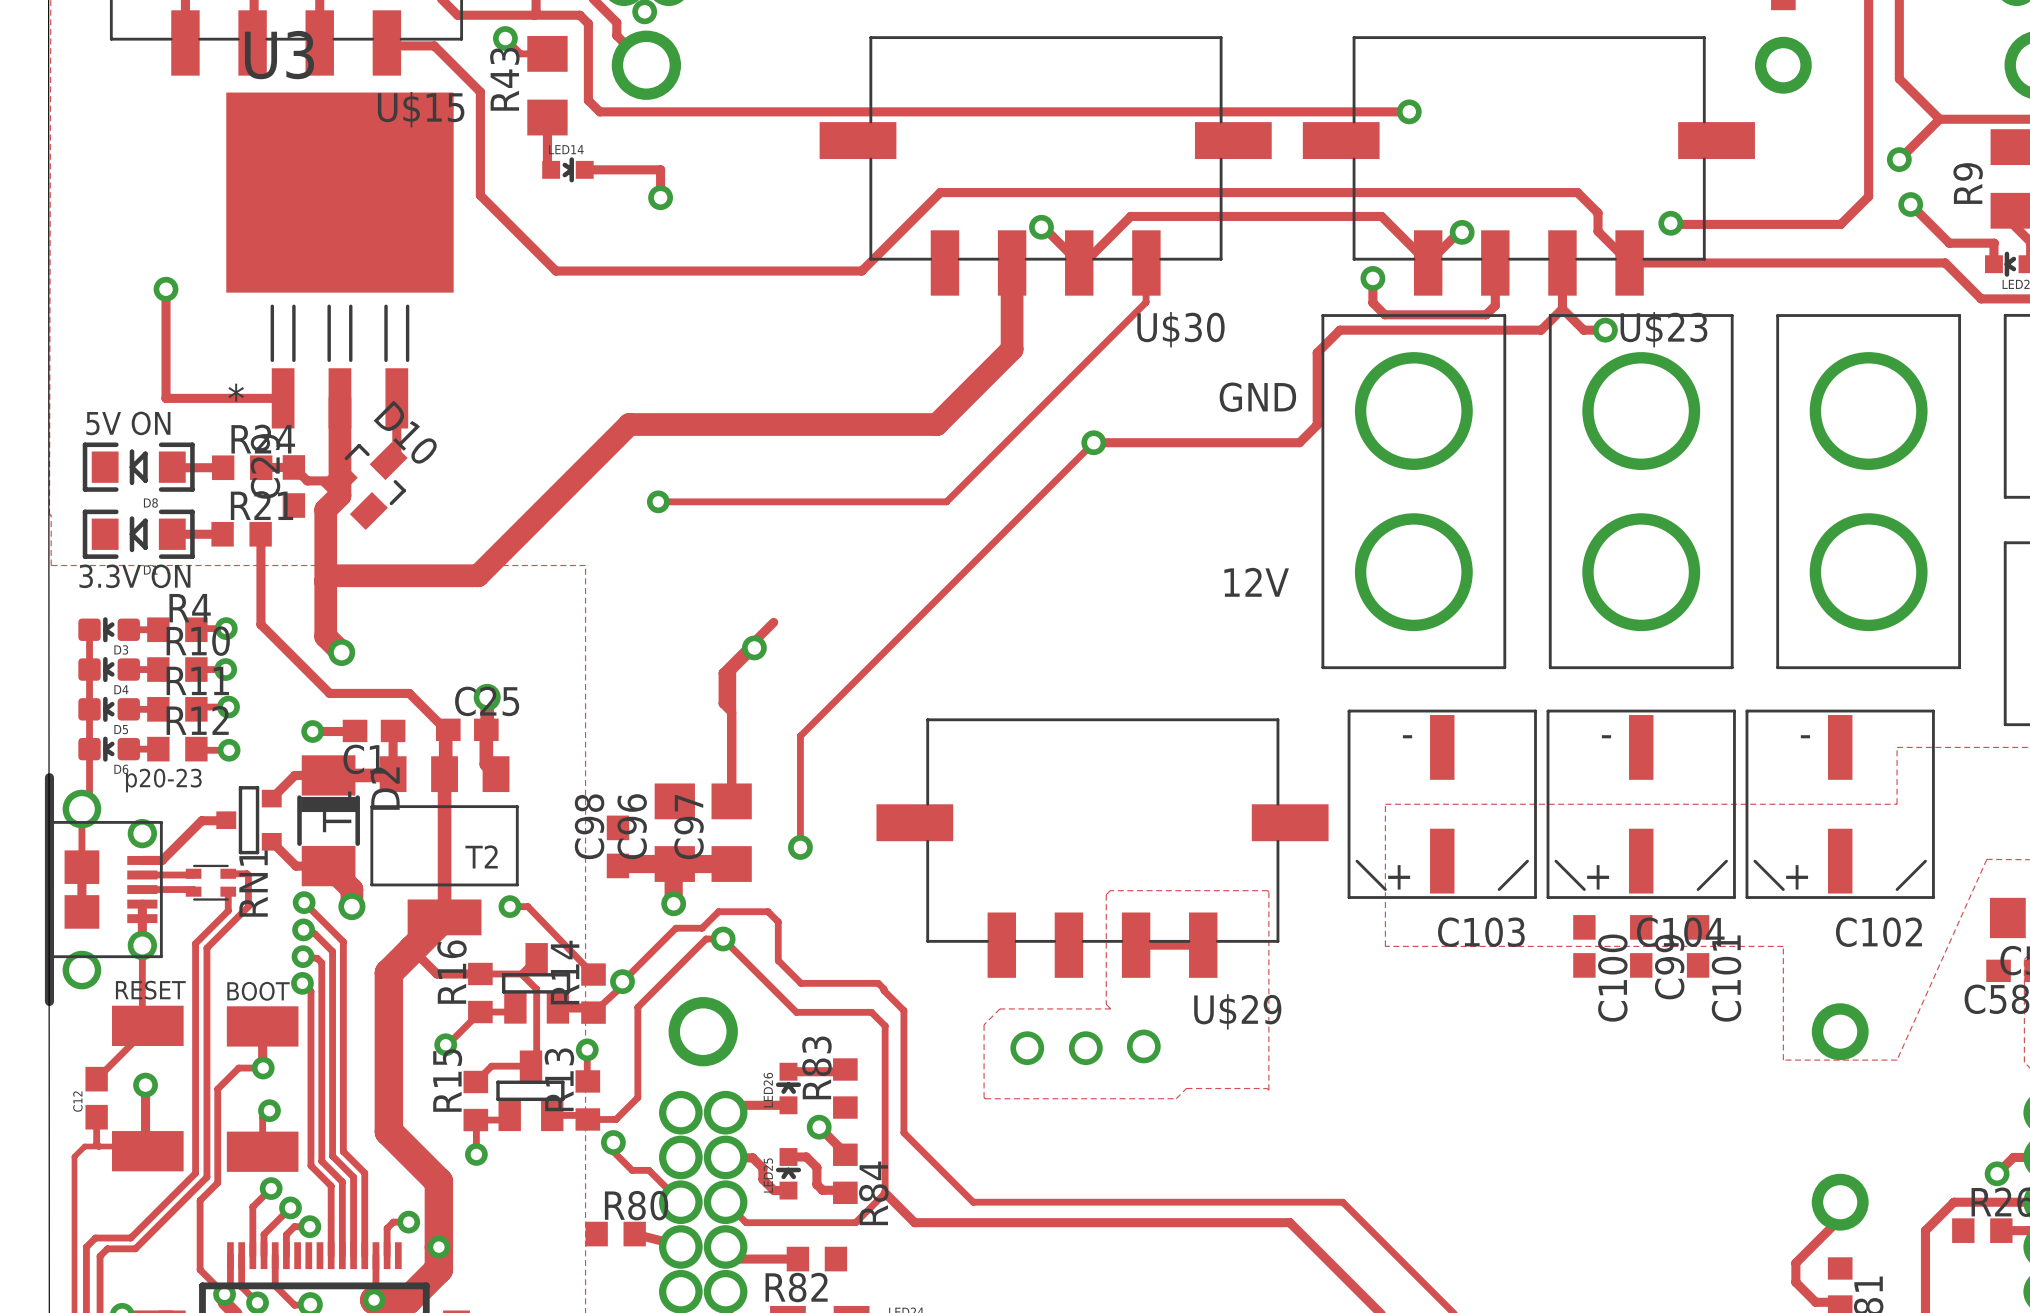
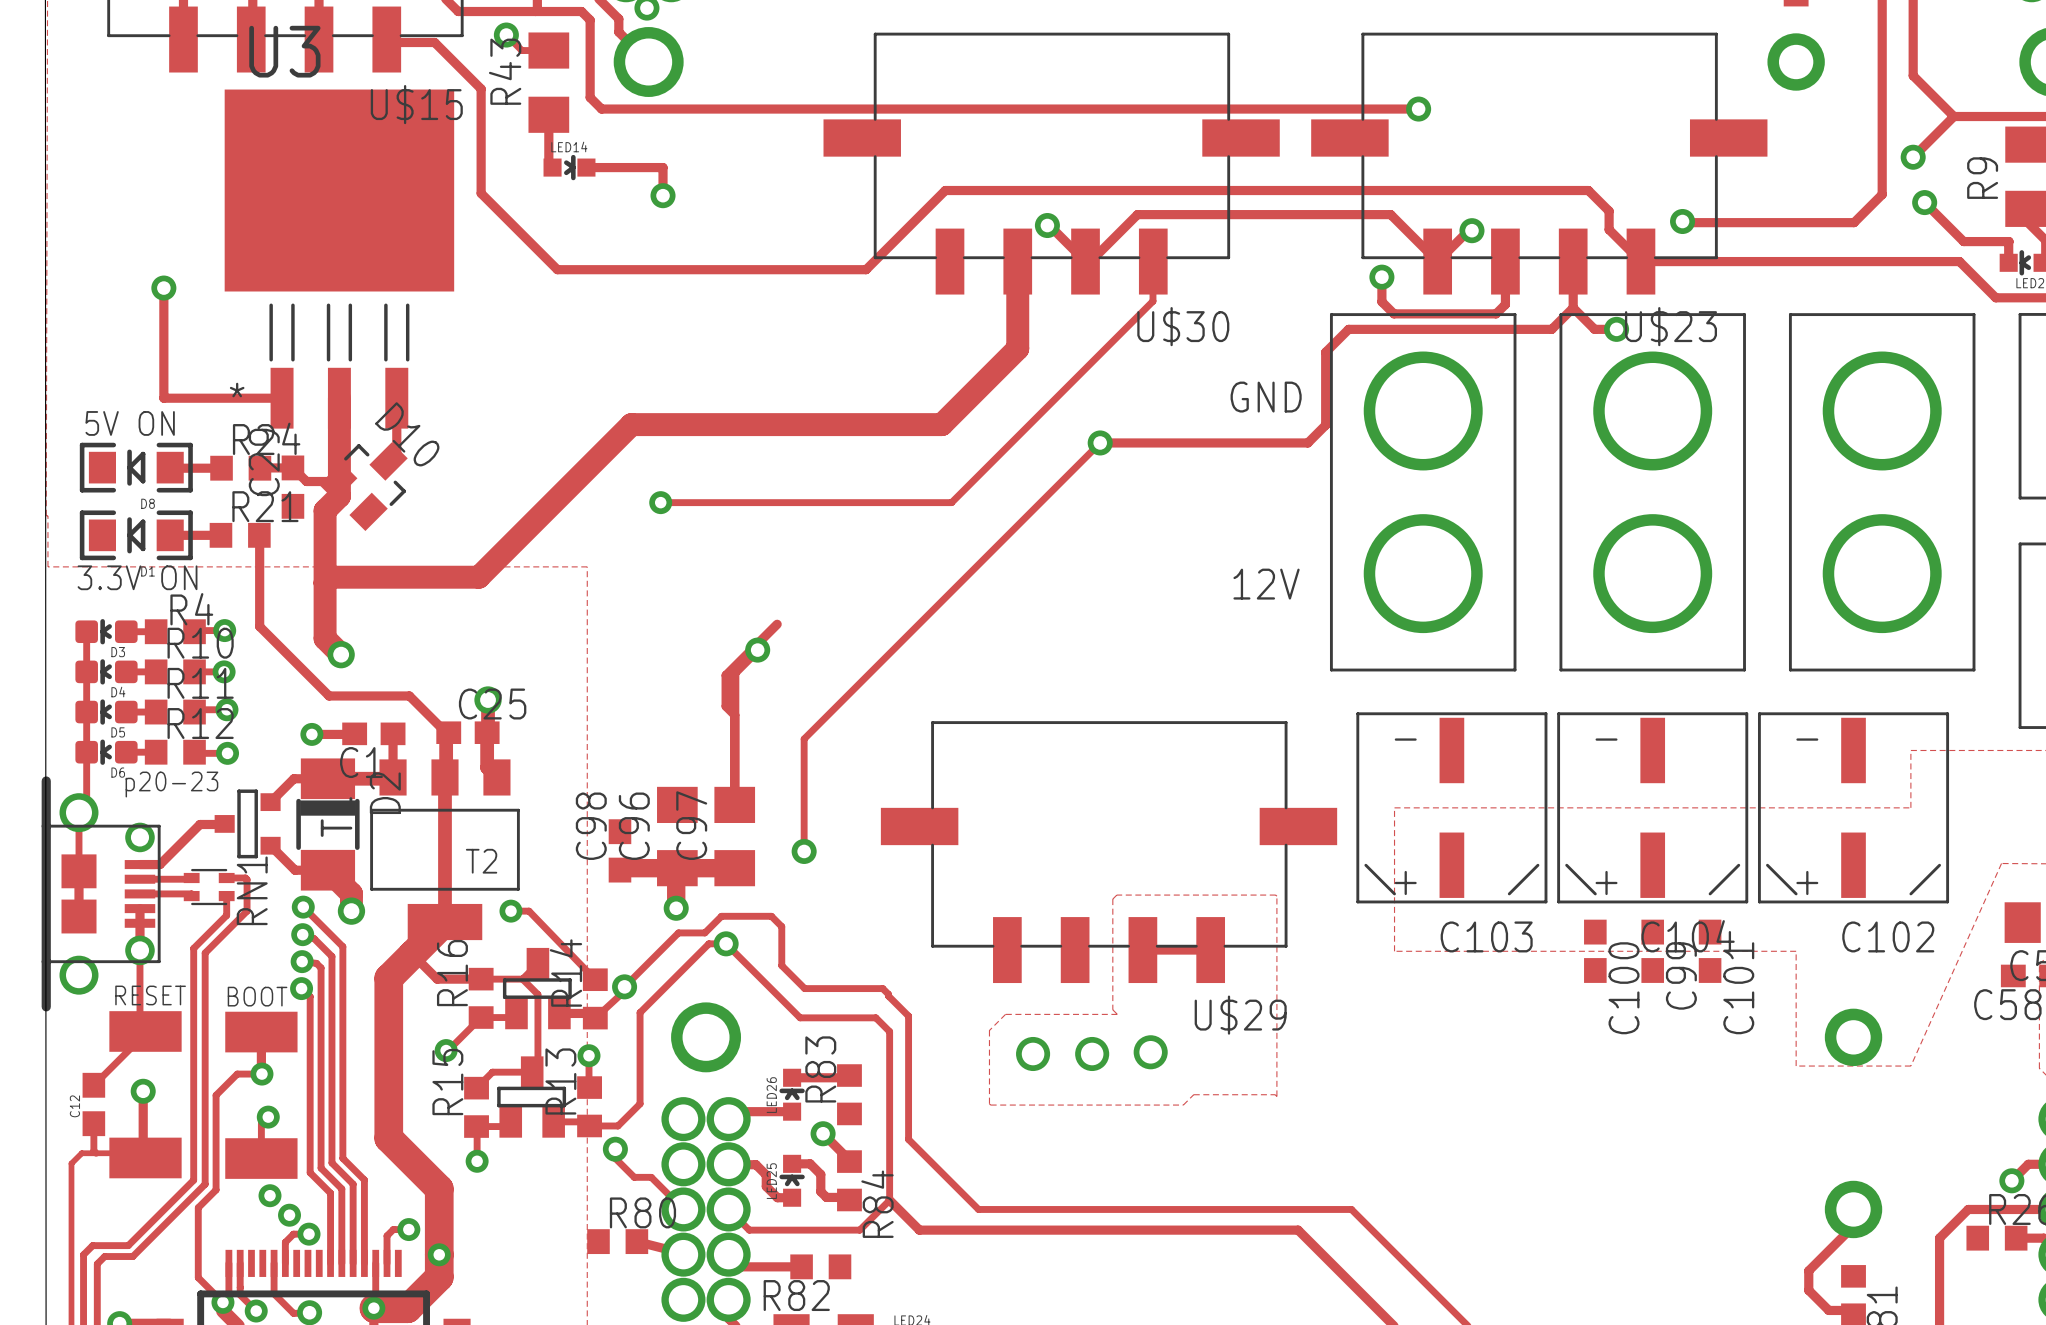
track: (271, 1188) (252, 1206) (252, 1255) -> none
track: (290, 1207) (264, 1234) (264, 1255) -> none

